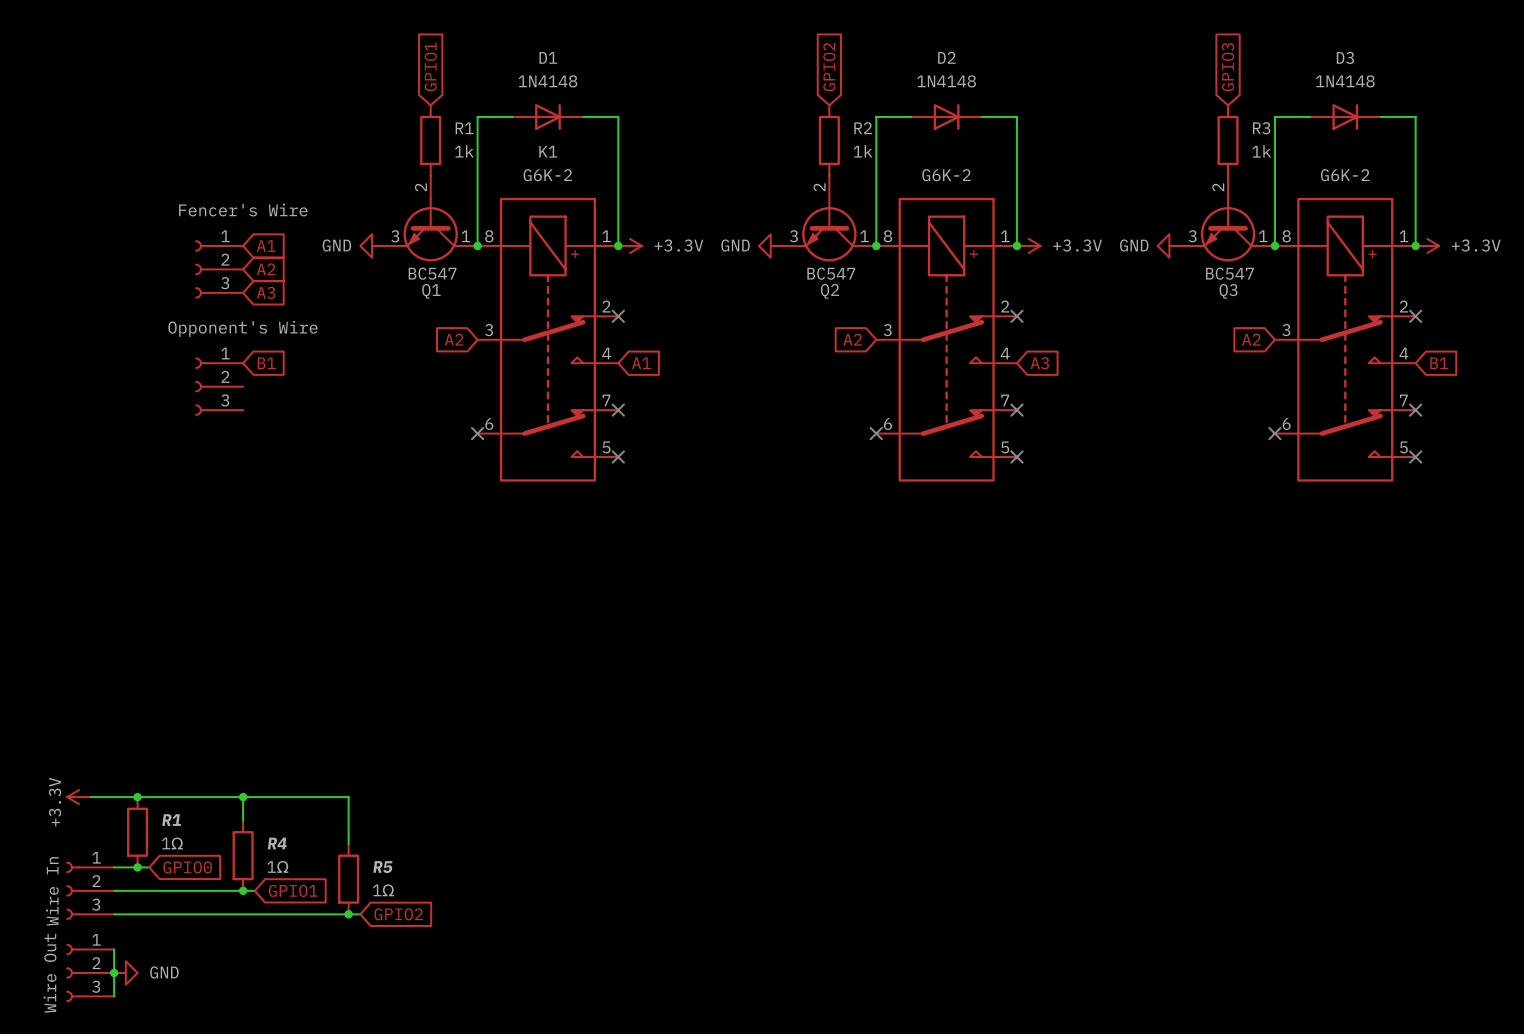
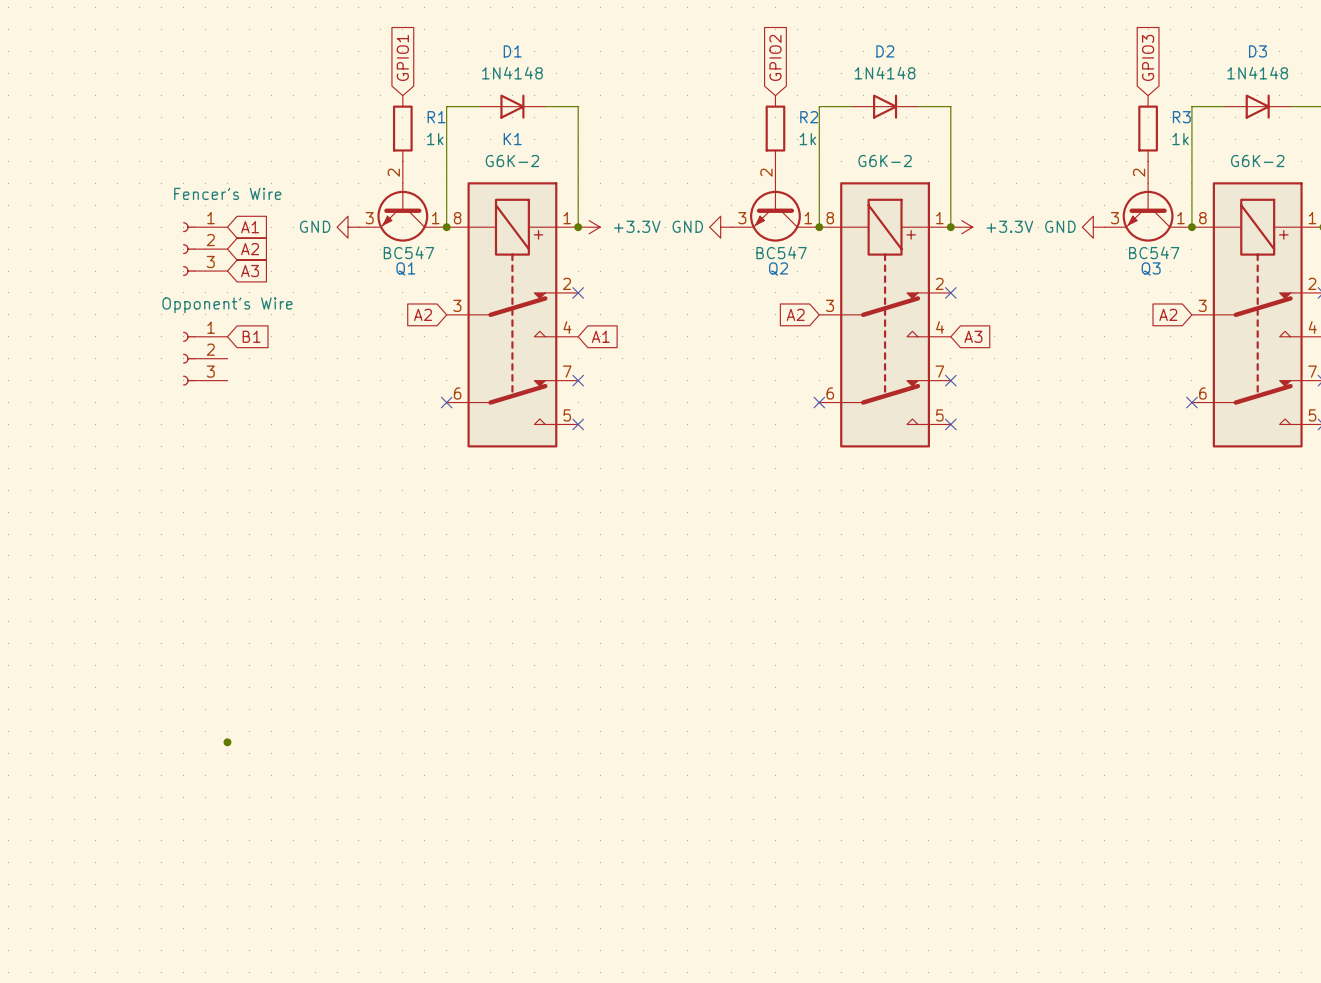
power symbol: +3.3V (78, 797) -> none
wire: (90, 797) (348, 797) (348, 843) -> none
junction: (137, 797) -> none
wire: (243, 797) (243, 820) -> none
R1: 1Ω (137, 832) -> none
R4: 1Ω (243, 855) -> none
wire: (114, 867) (149, 867) -> none
junction: (137, 867) -> none
global label: GPIO0 (187, 867) -> none
R5: 1Ω (348, 879) -> none
part: Wire In (90, 890) -> none
wire: (114, 890) (254, 890) -> none
junction: (243, 890) -> none
global label: GPIO1 (293, 890) -> none
wire: (114, 914) (360, 914) -> none
junction: (348, 914) -> none
global label: GPIO2 (398, 914) -> none
wire: (114, 949) (114, 996) -> none
part: Wire Out (90, 972) -> none
junction: (114, 972) -> none
power symbol: GND (125, 972) -> none

